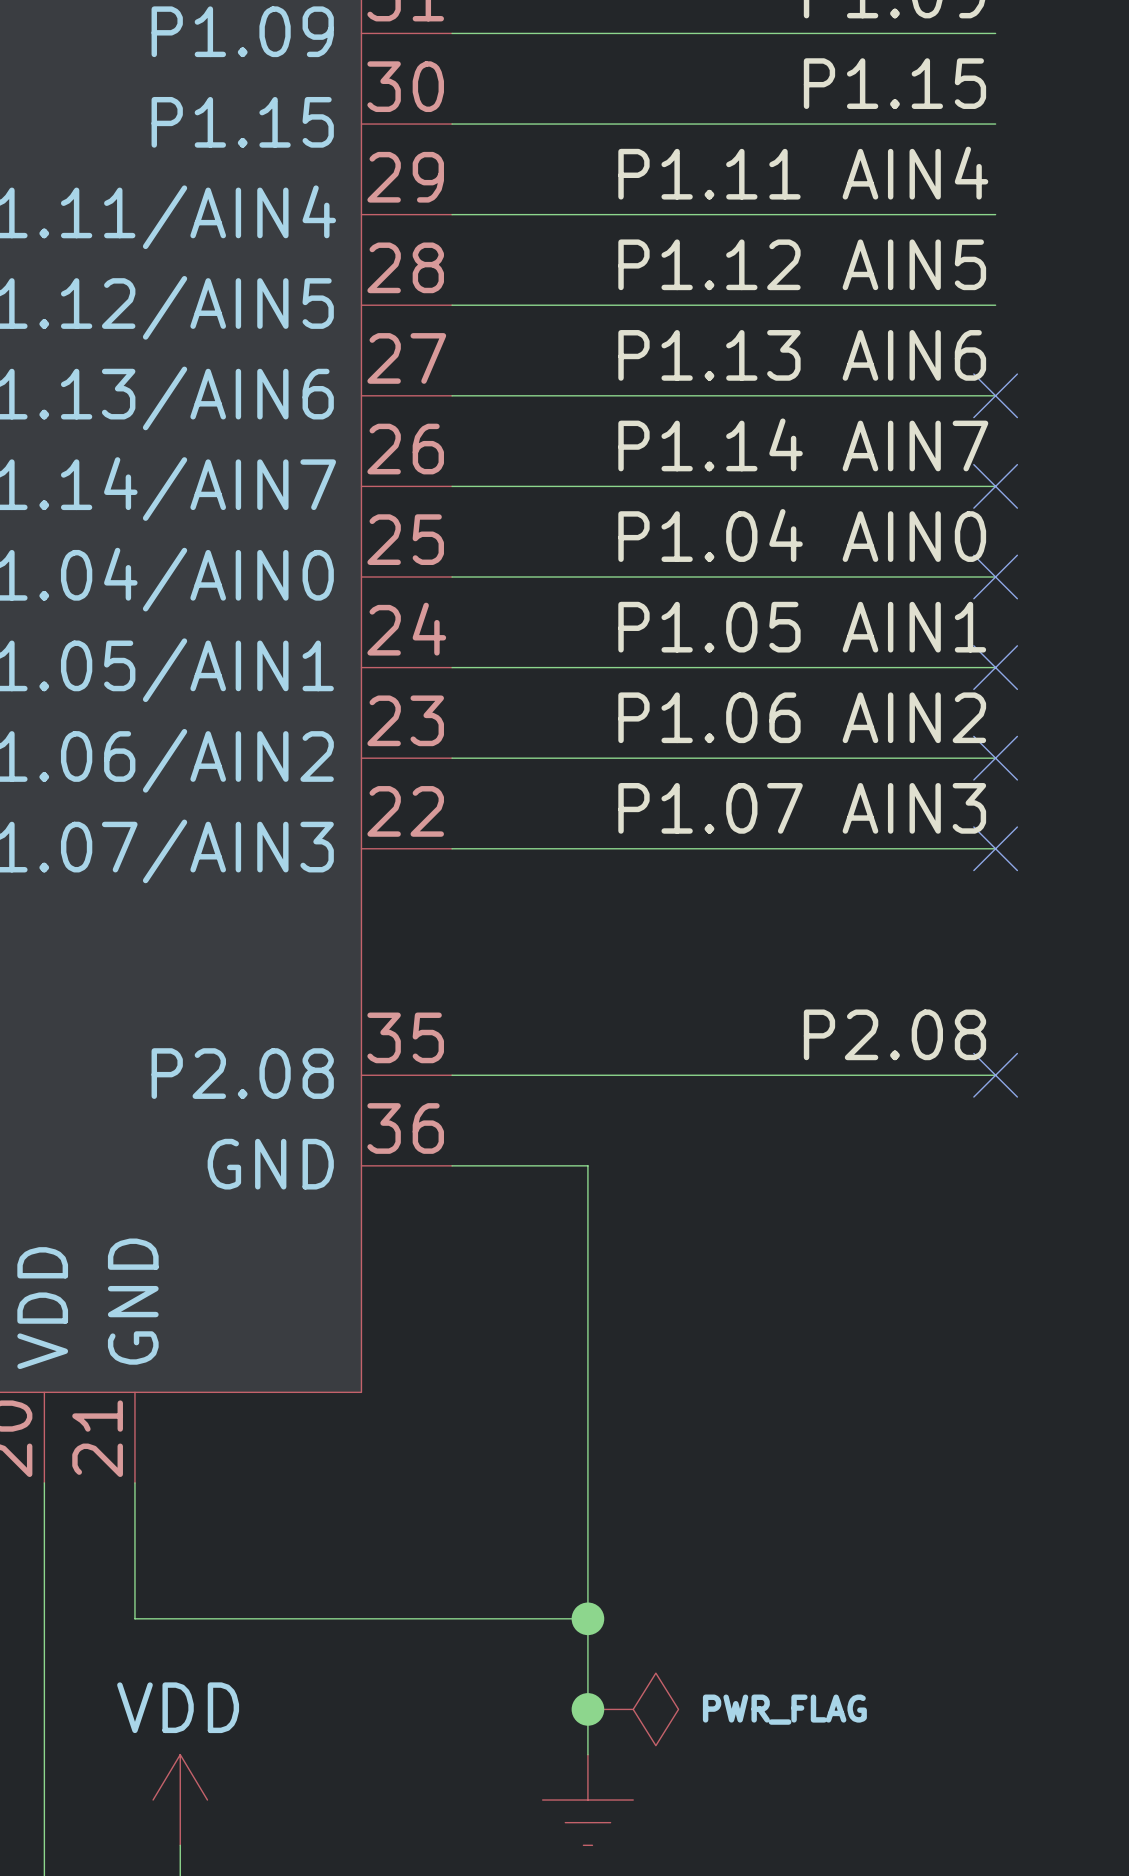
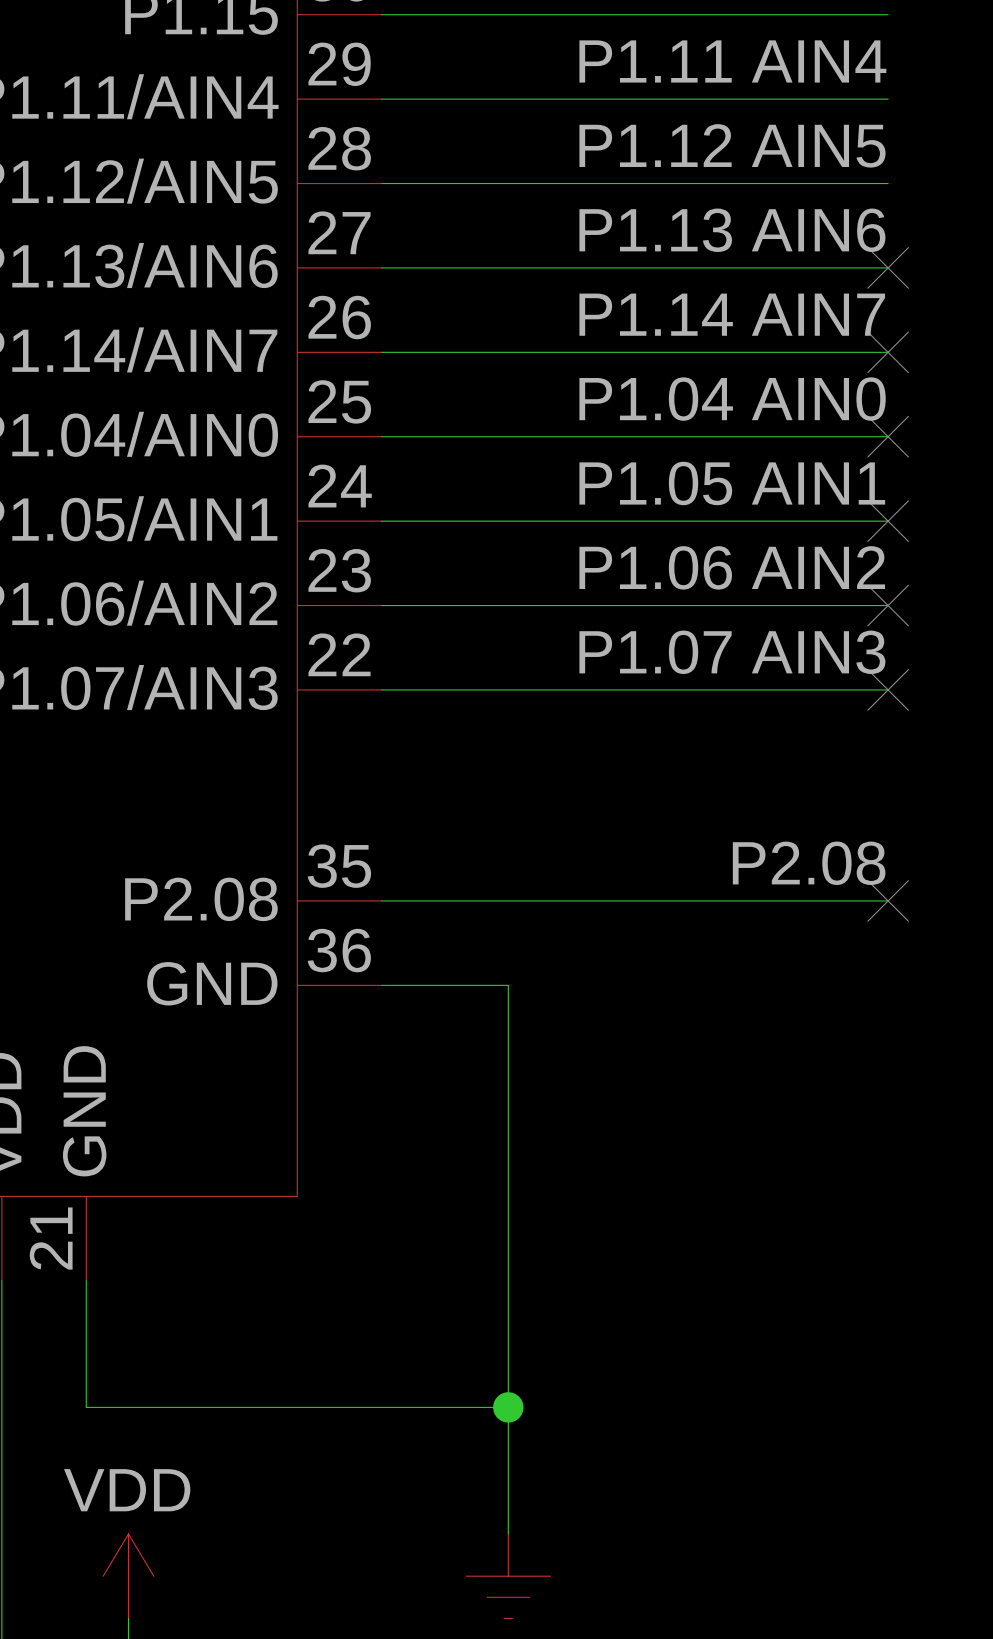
junction: (587, 1709) -> none
power symbol: PWR_FLAG (633, 1709) -> none

